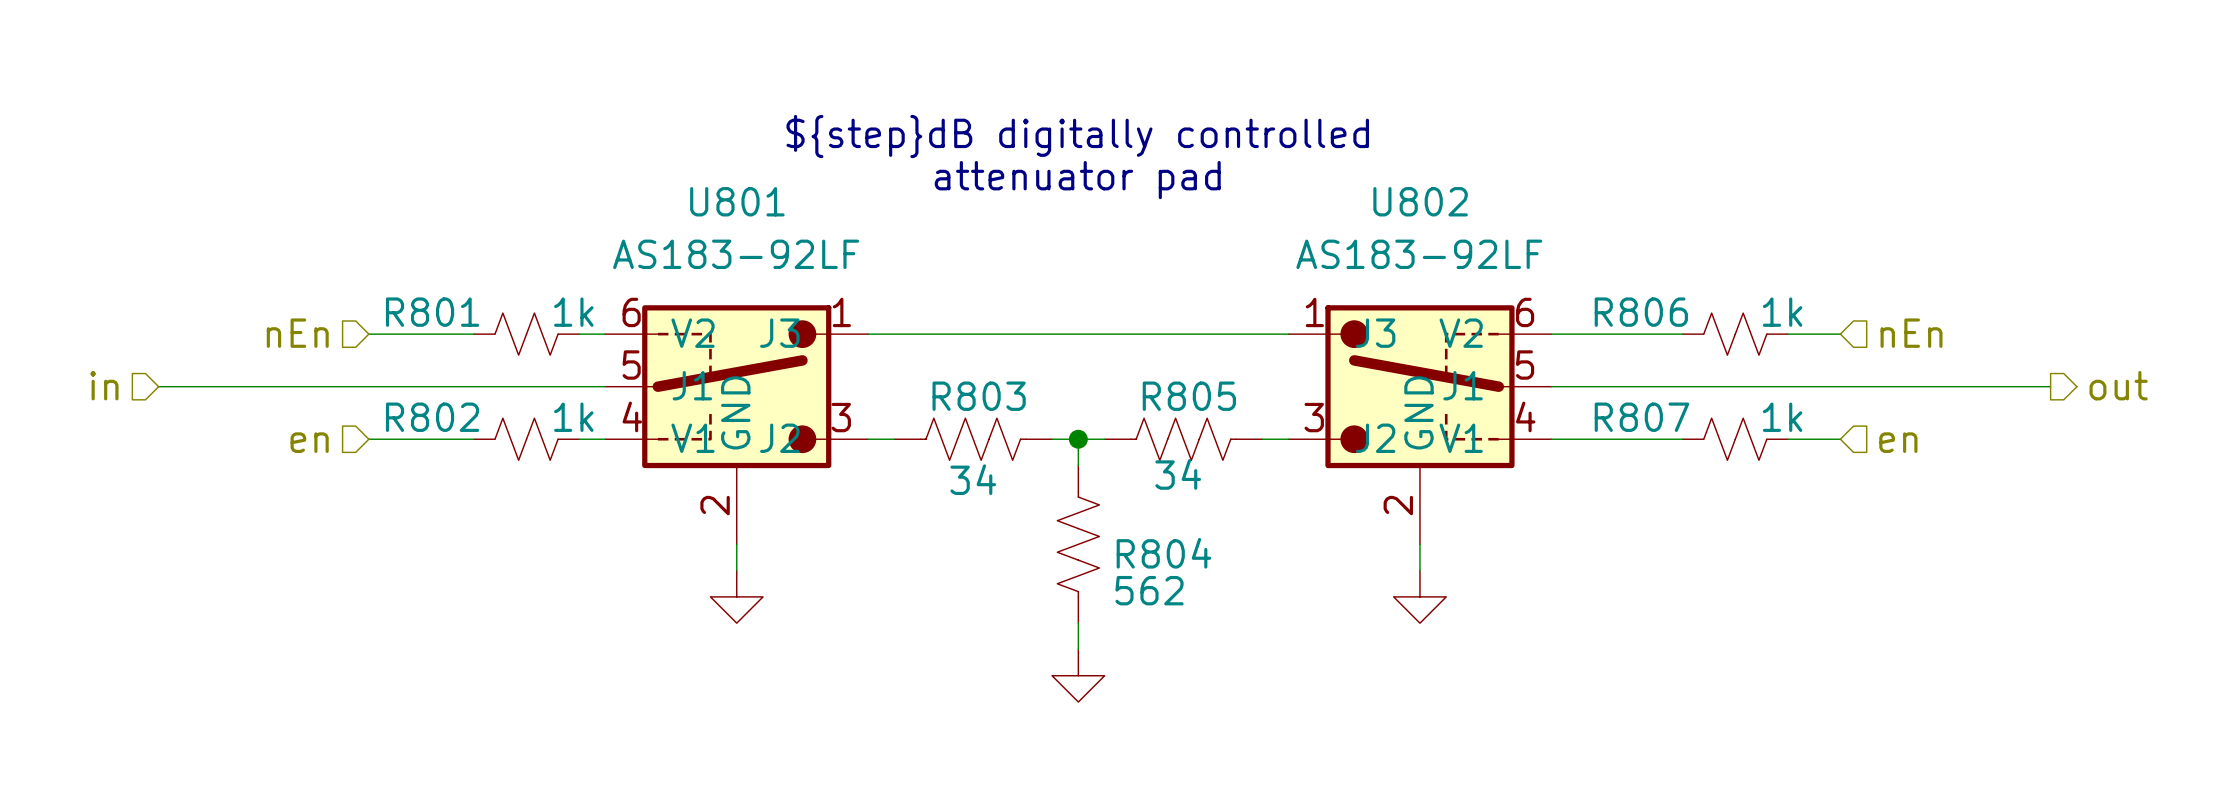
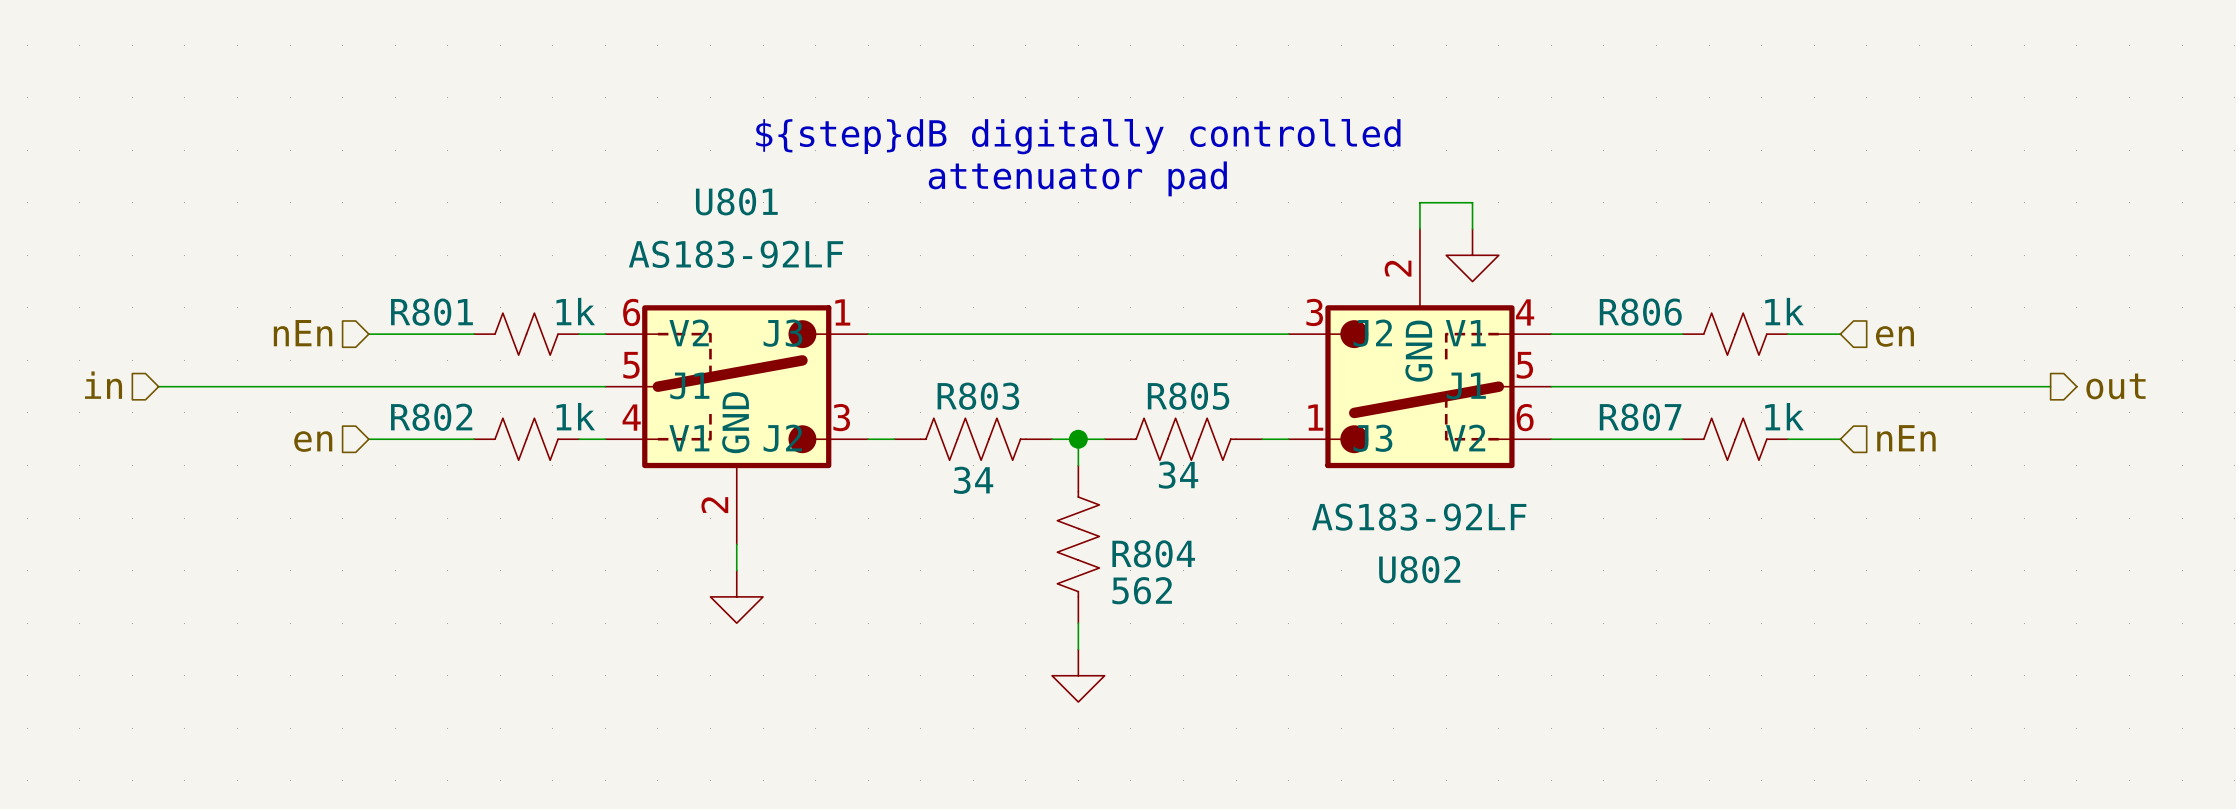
wire: none -> (1419, 229) (1419, 202) (1472, 202) (1472, 229)
hierarchical label: nEn (1911, 333) -> en (1894, 336)
U802 flip: as is (1419, 386) -> up-down (1419, 386)
hierarchical label: en (1898, 442) -> nEn (1906, 438)
wire: (1419, 544) (1419, 570) -> none
power symbol position: (1419, 596) -> (1472, 255)

